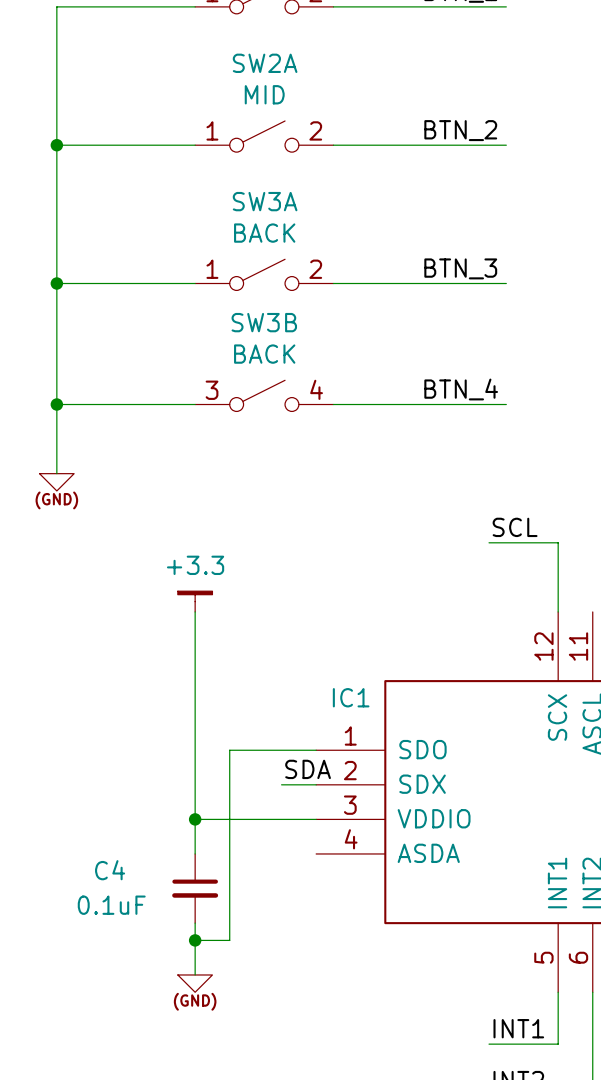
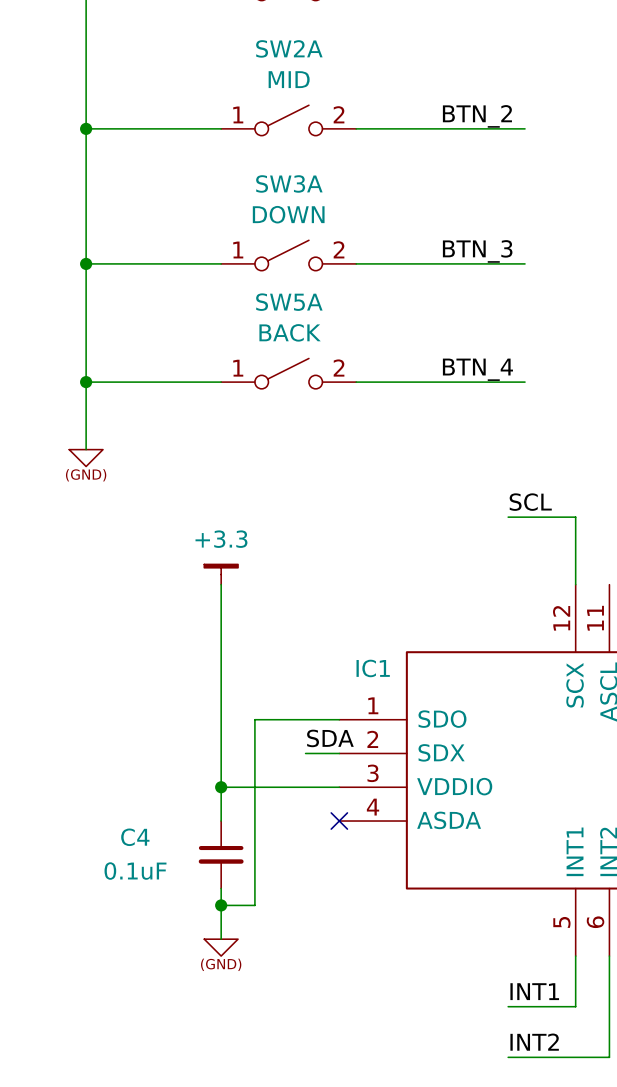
SW3A value: BACK (264, 233) -> DOWN (288, 214)
SW3B name: SW3B (264, 322) -> SW5A (289, 302)
SW3B pin number: 4 (316, 389) -> 2 (339, 368)
SW3B pin number: 3 (212, 390) -> 1 (238, 368)
no-connect mark: none -> (339, 821)

